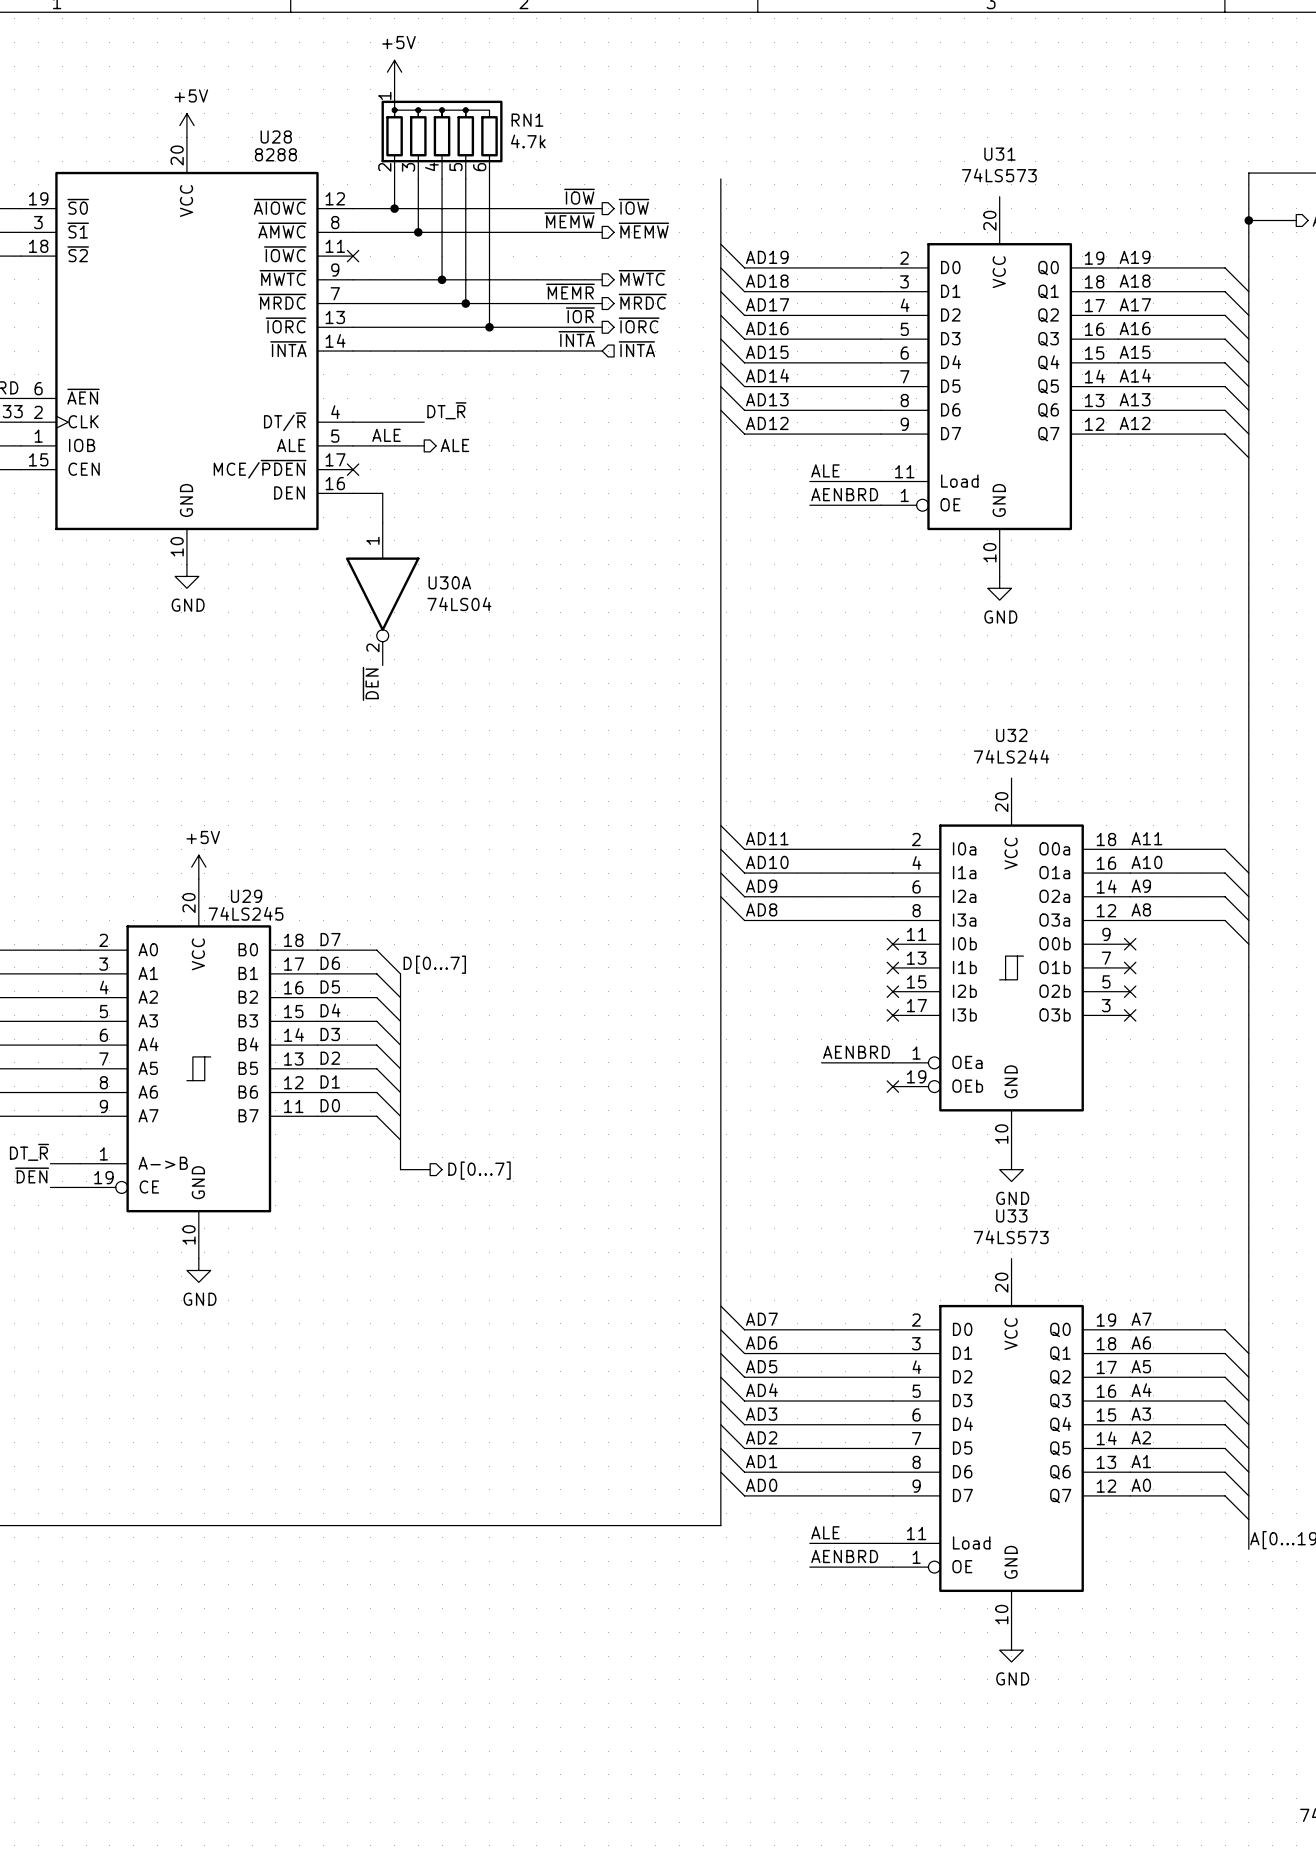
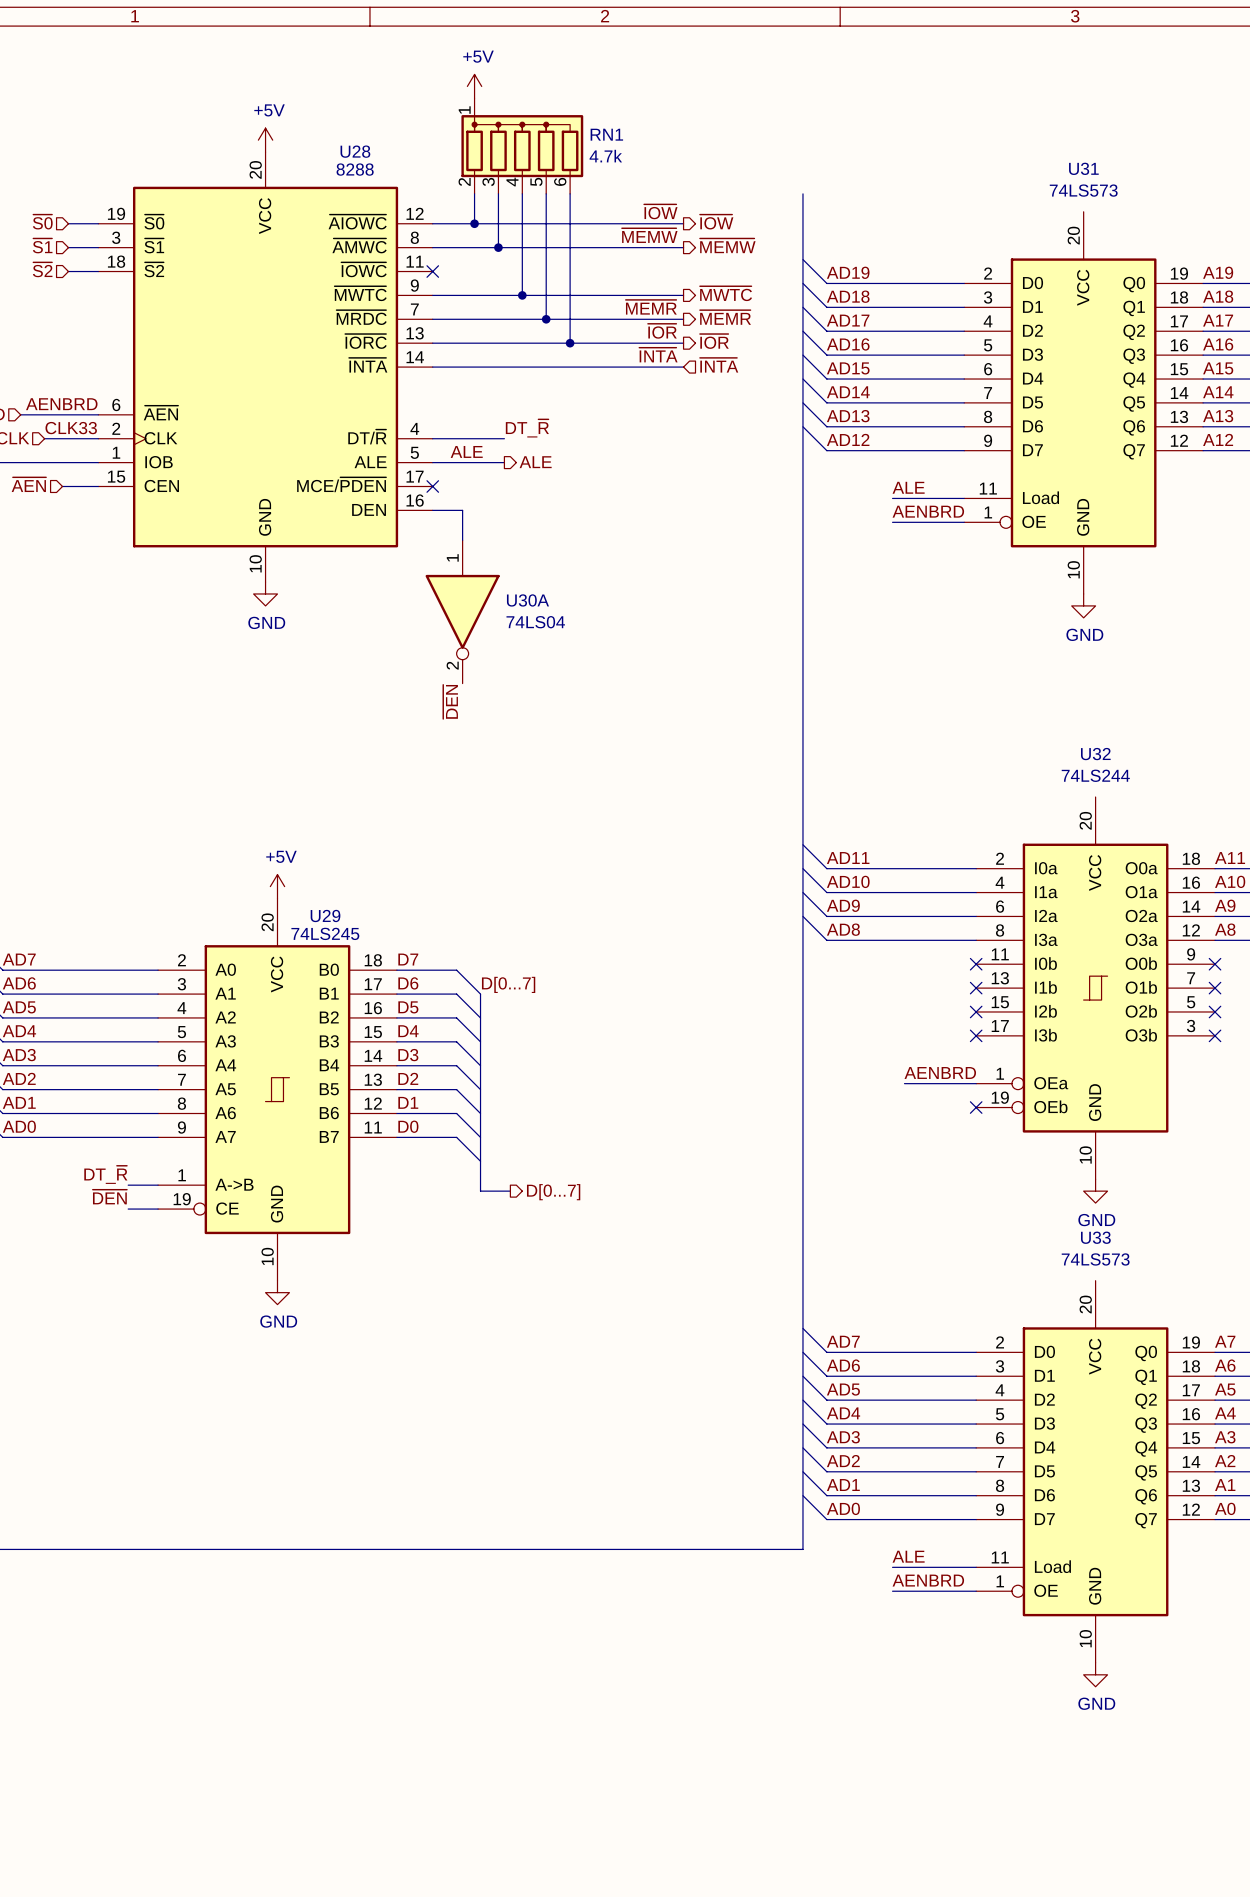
hierarchical label: ~{MRDC} (642, 301) -> ~{MEMR} (725, 317)
hierarchical label: ~{IORC} (639, 325) -> ~{IOR} (714, 341)

